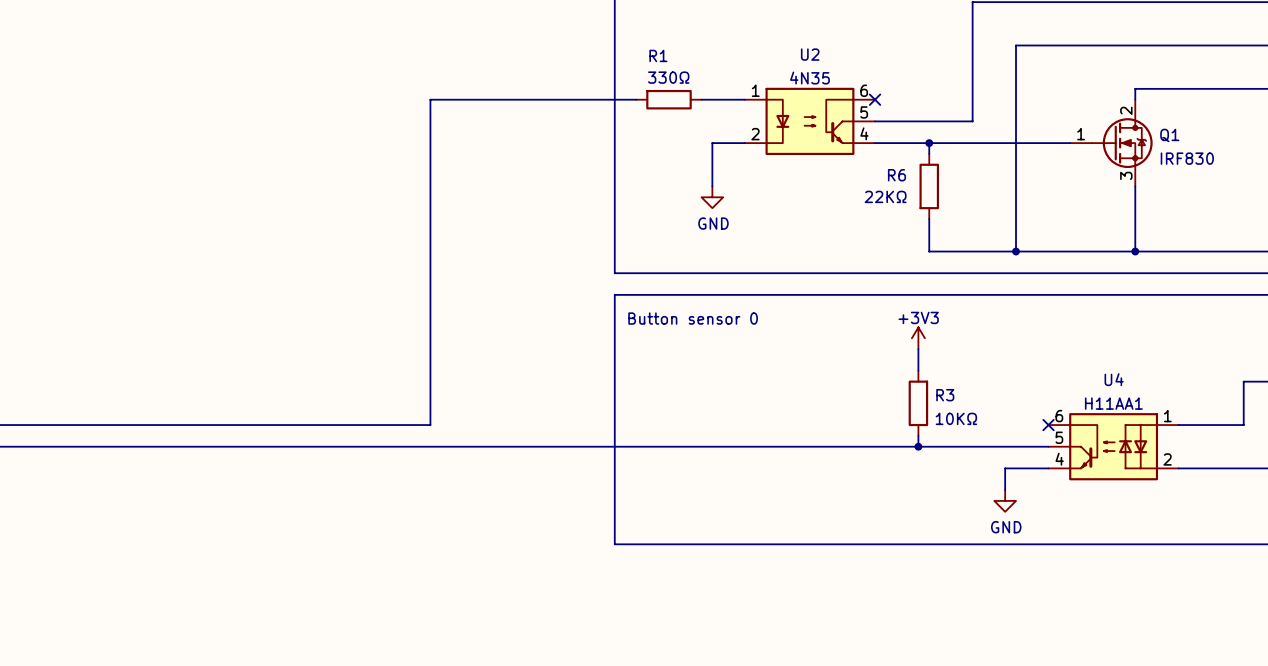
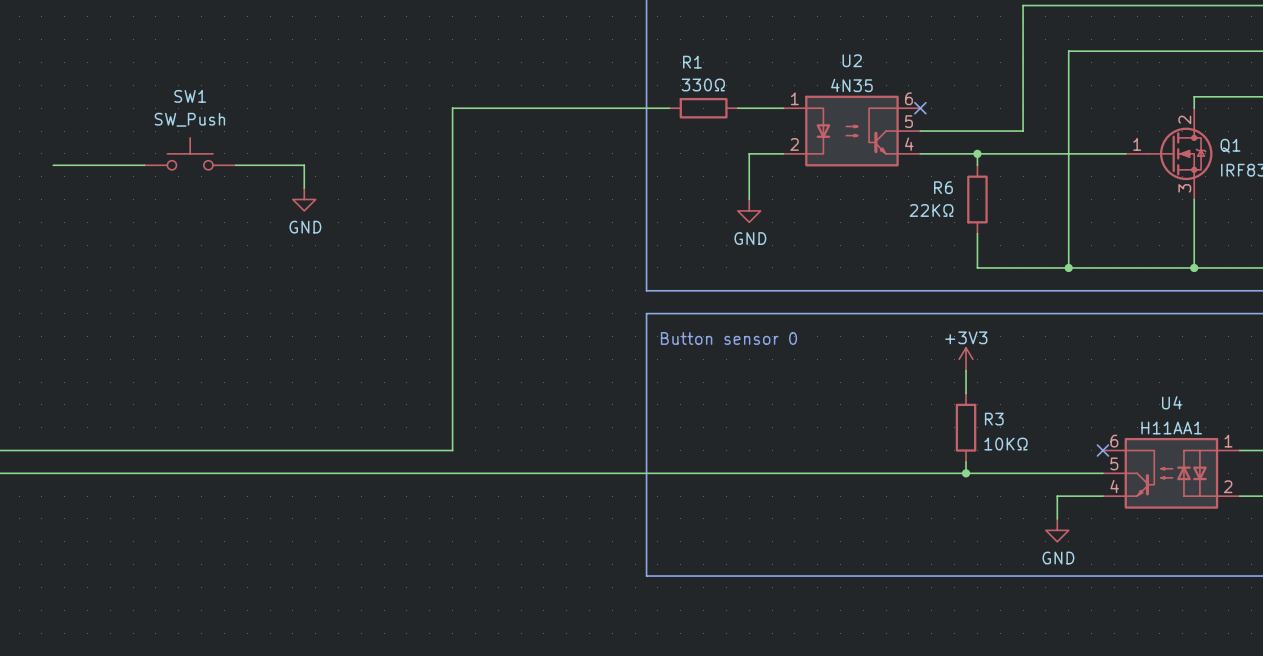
SW1: none -> SW_Push (190, 153)
wire: none -> (53, 165) (144, 165)
wire: none -> (235, 165) (304, 165) (304, 188)
power symbol: none -> GND (304, 199)

